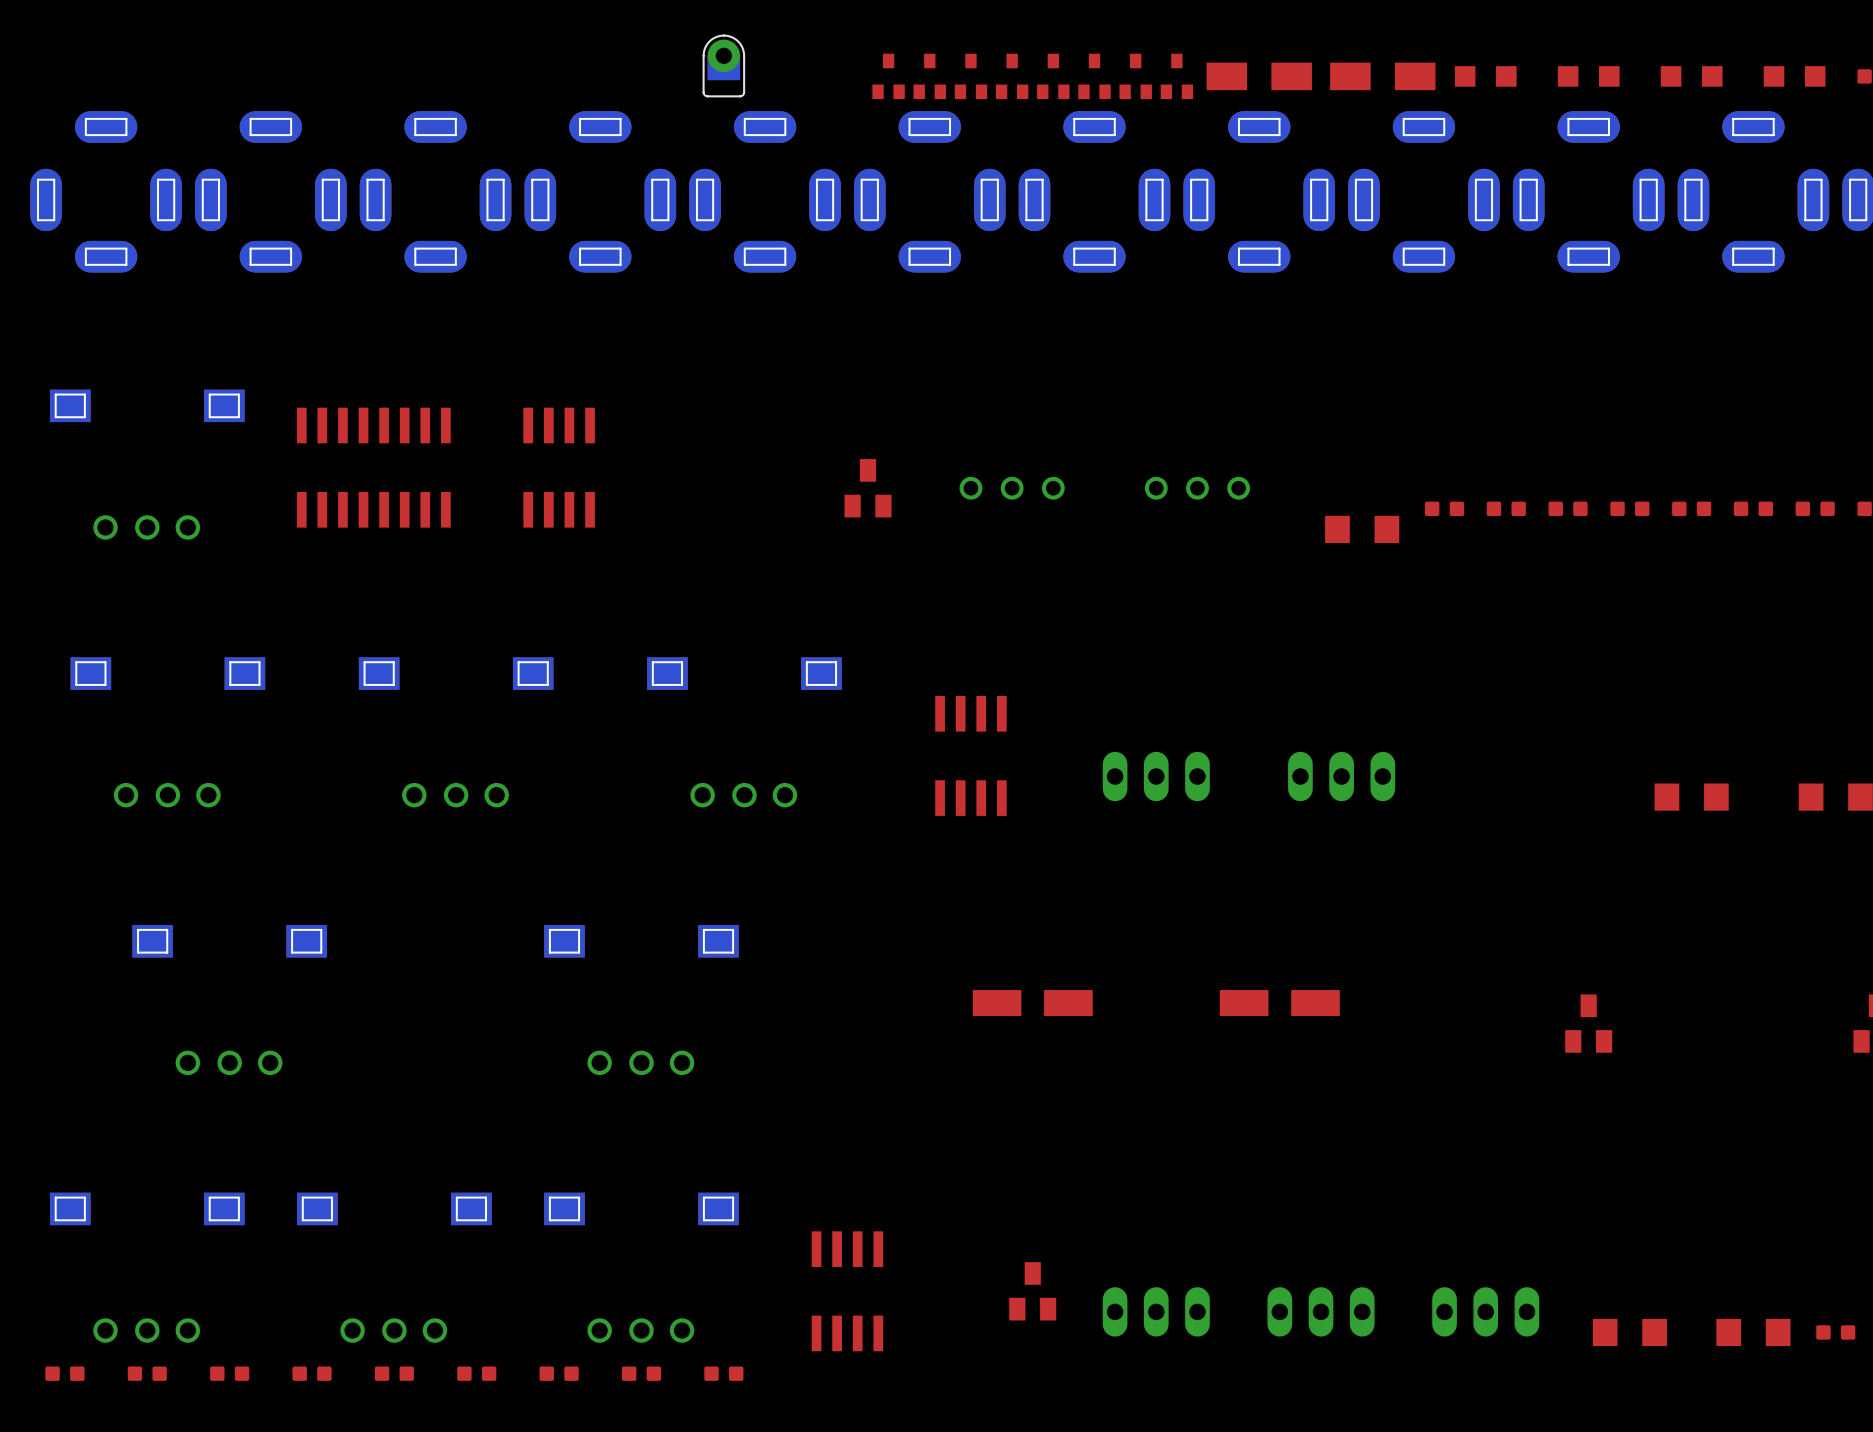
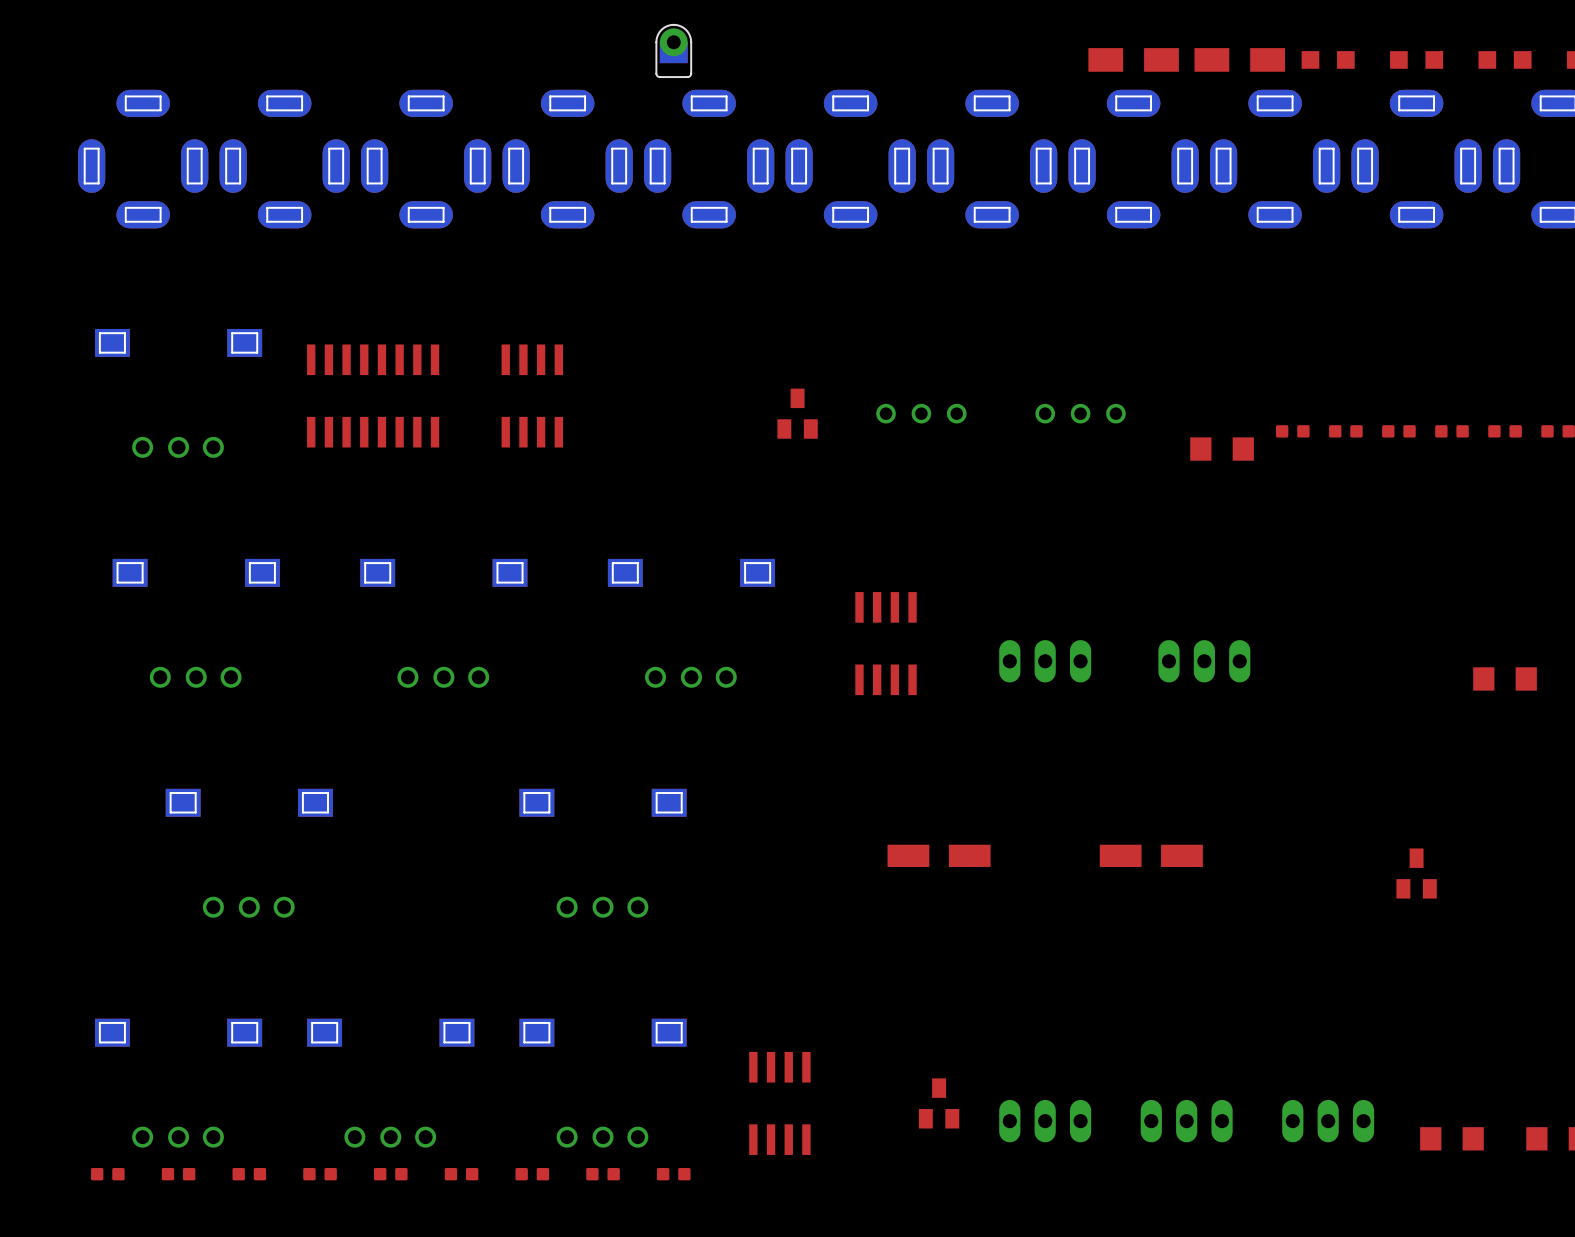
part: (888, 76) -> none
part: (929, 76) -> none
part: (970, 76) -> none
part: (1012, 76) -> none
part: (1053, 76) -> none
part: (1094, 76) -> none
part: (1135, 76) -> none
part: (1176, 76) -> none

